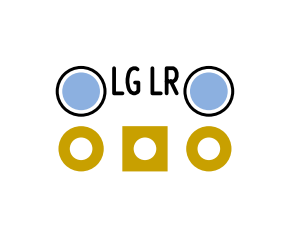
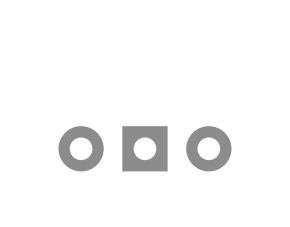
text: LG (126, 80) -> none
text: LR (164, 80) -> none
part: (81, 91) -> none
part: (208, 91) -> none

